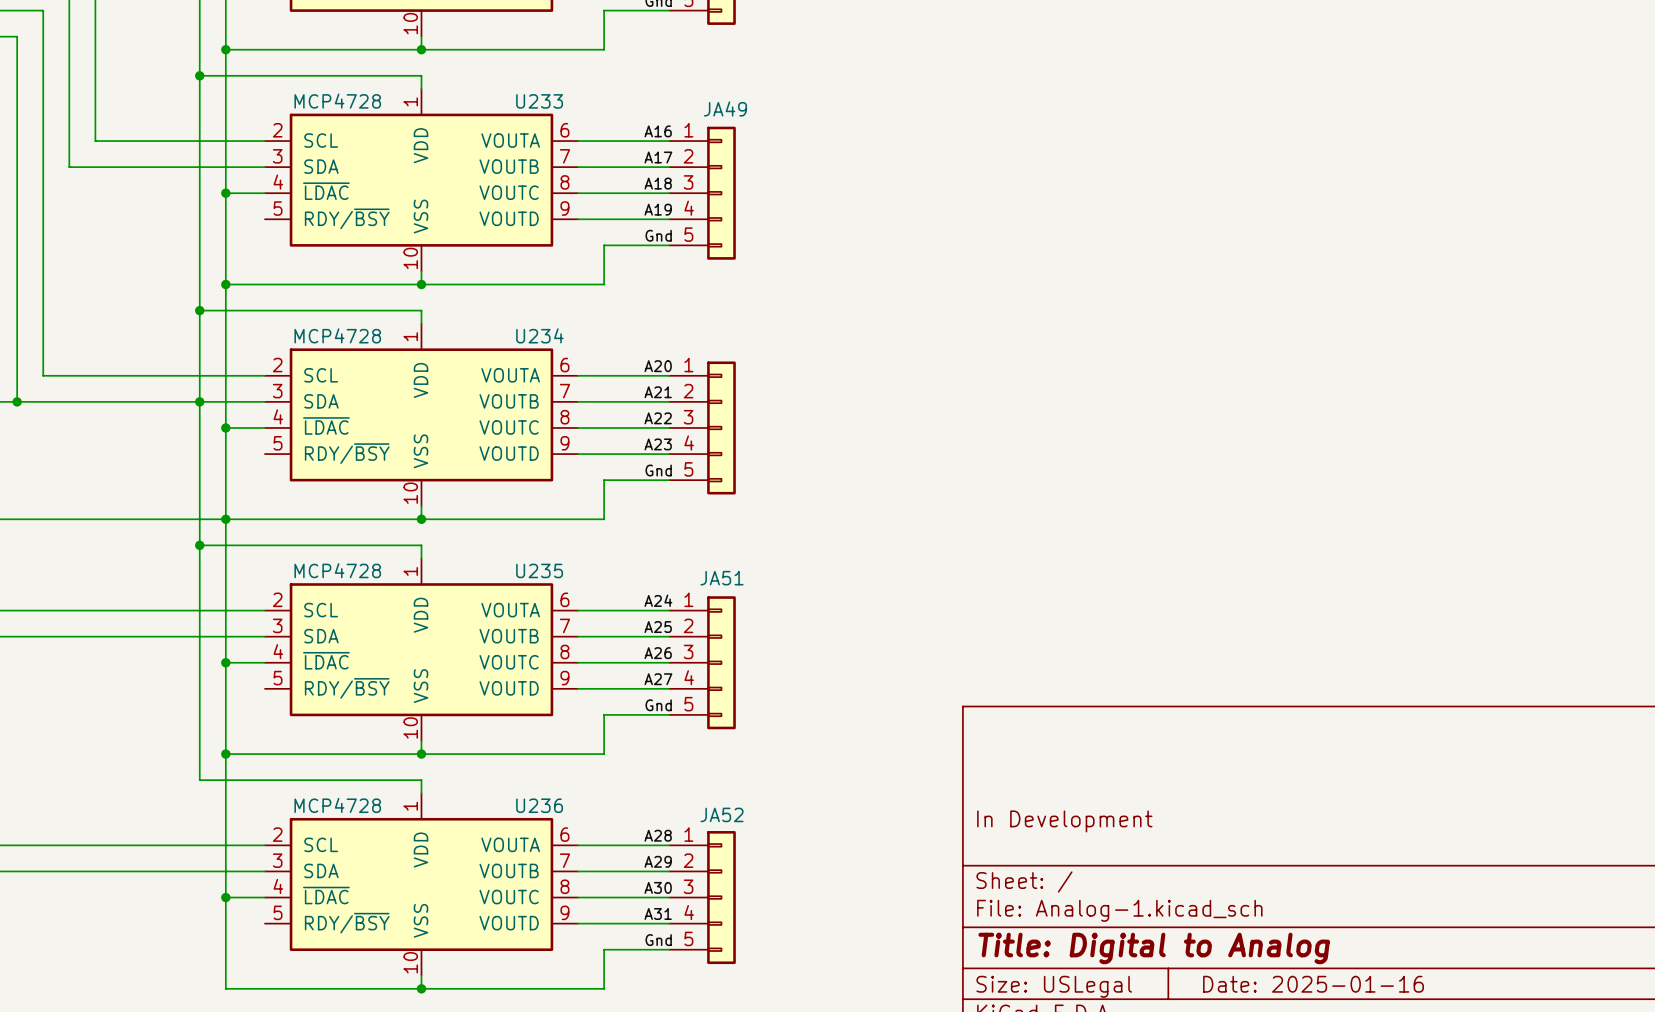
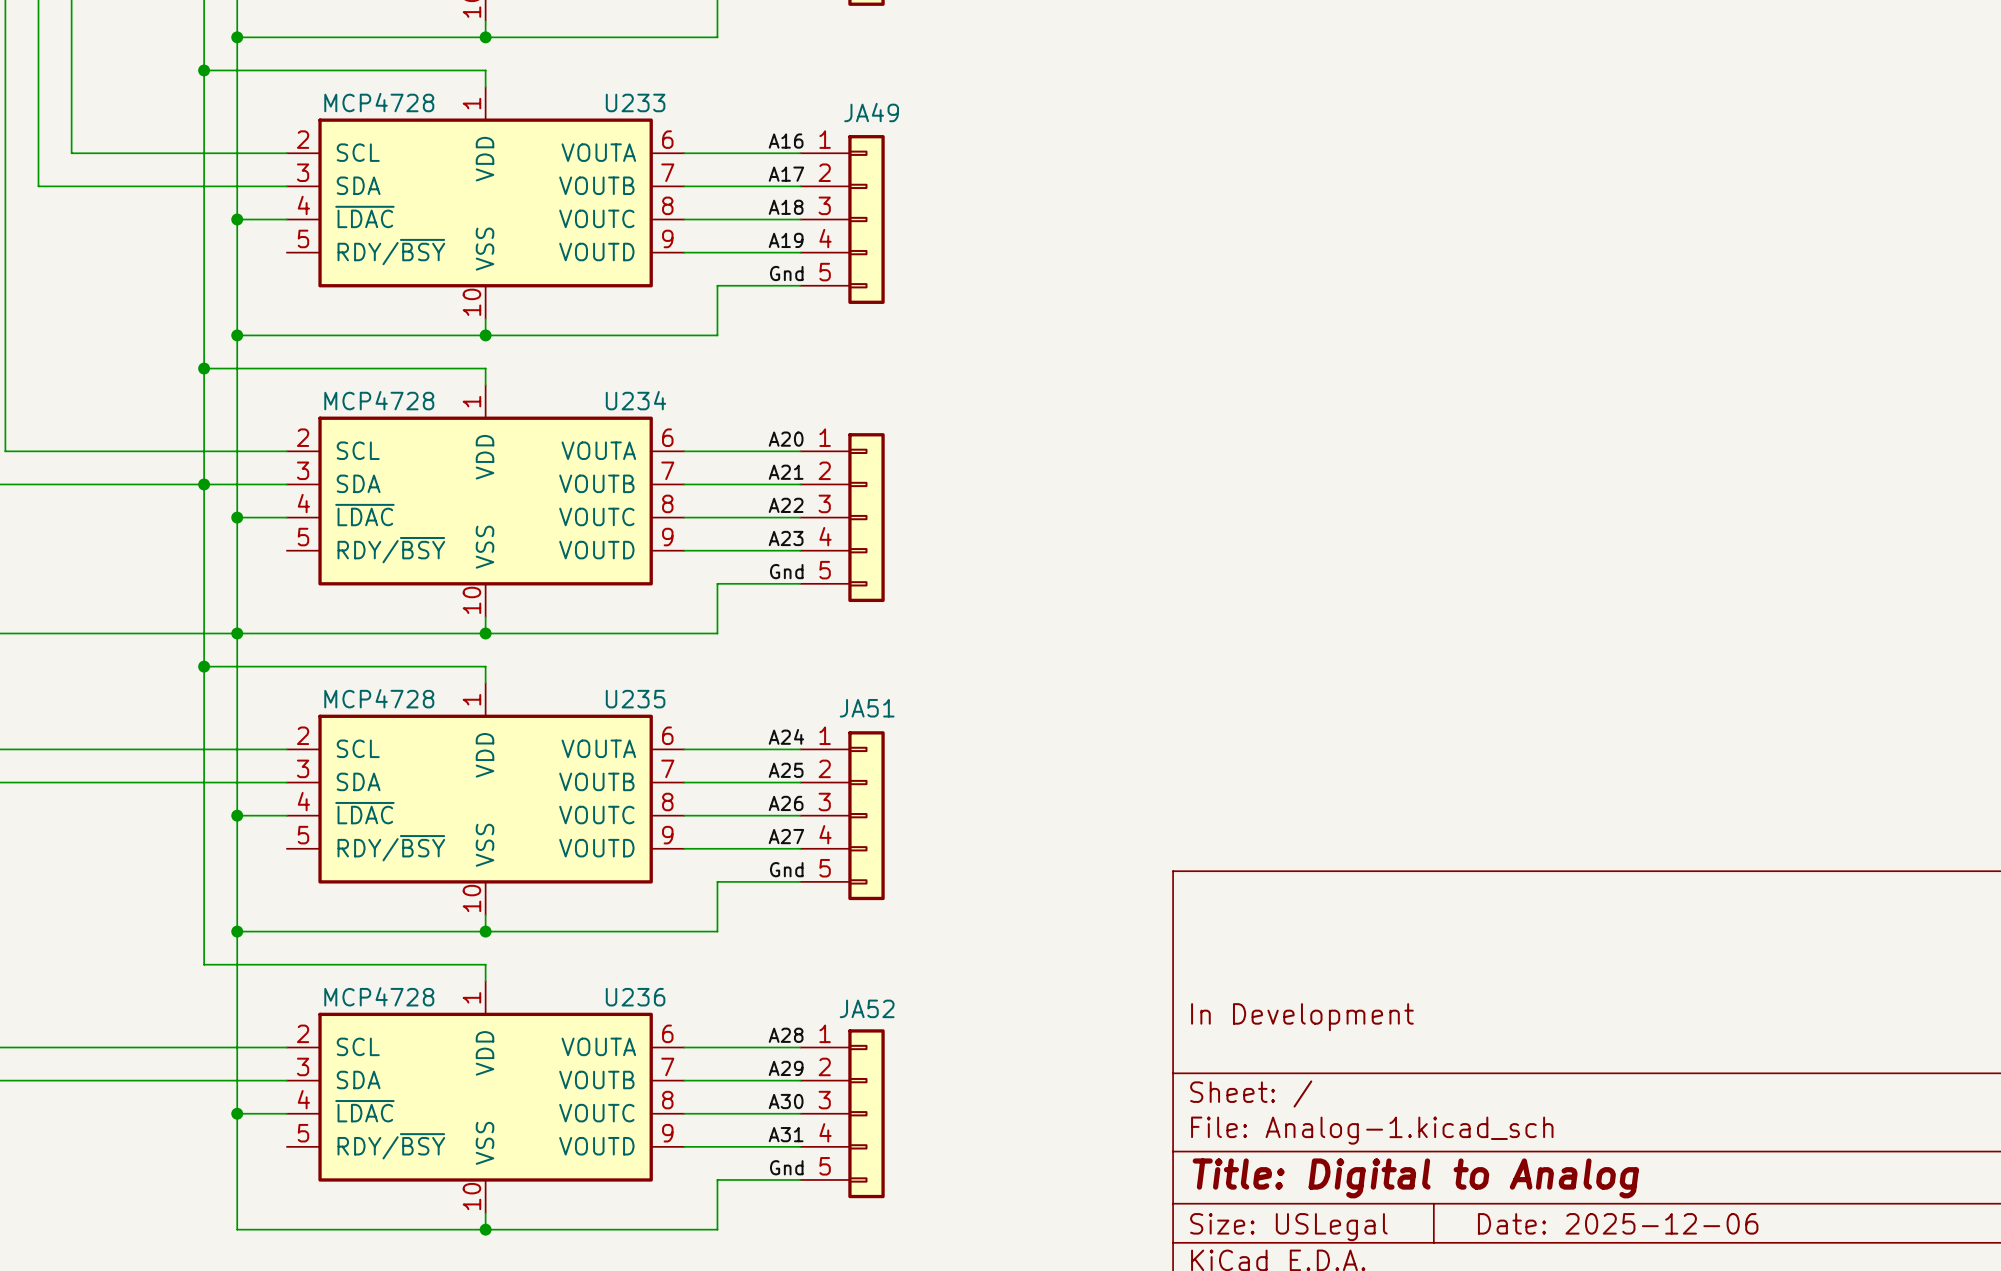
title block: Date: 2025-01-16 (1313, 984) -> Date: 2025-12-06 (1618, 1223)

